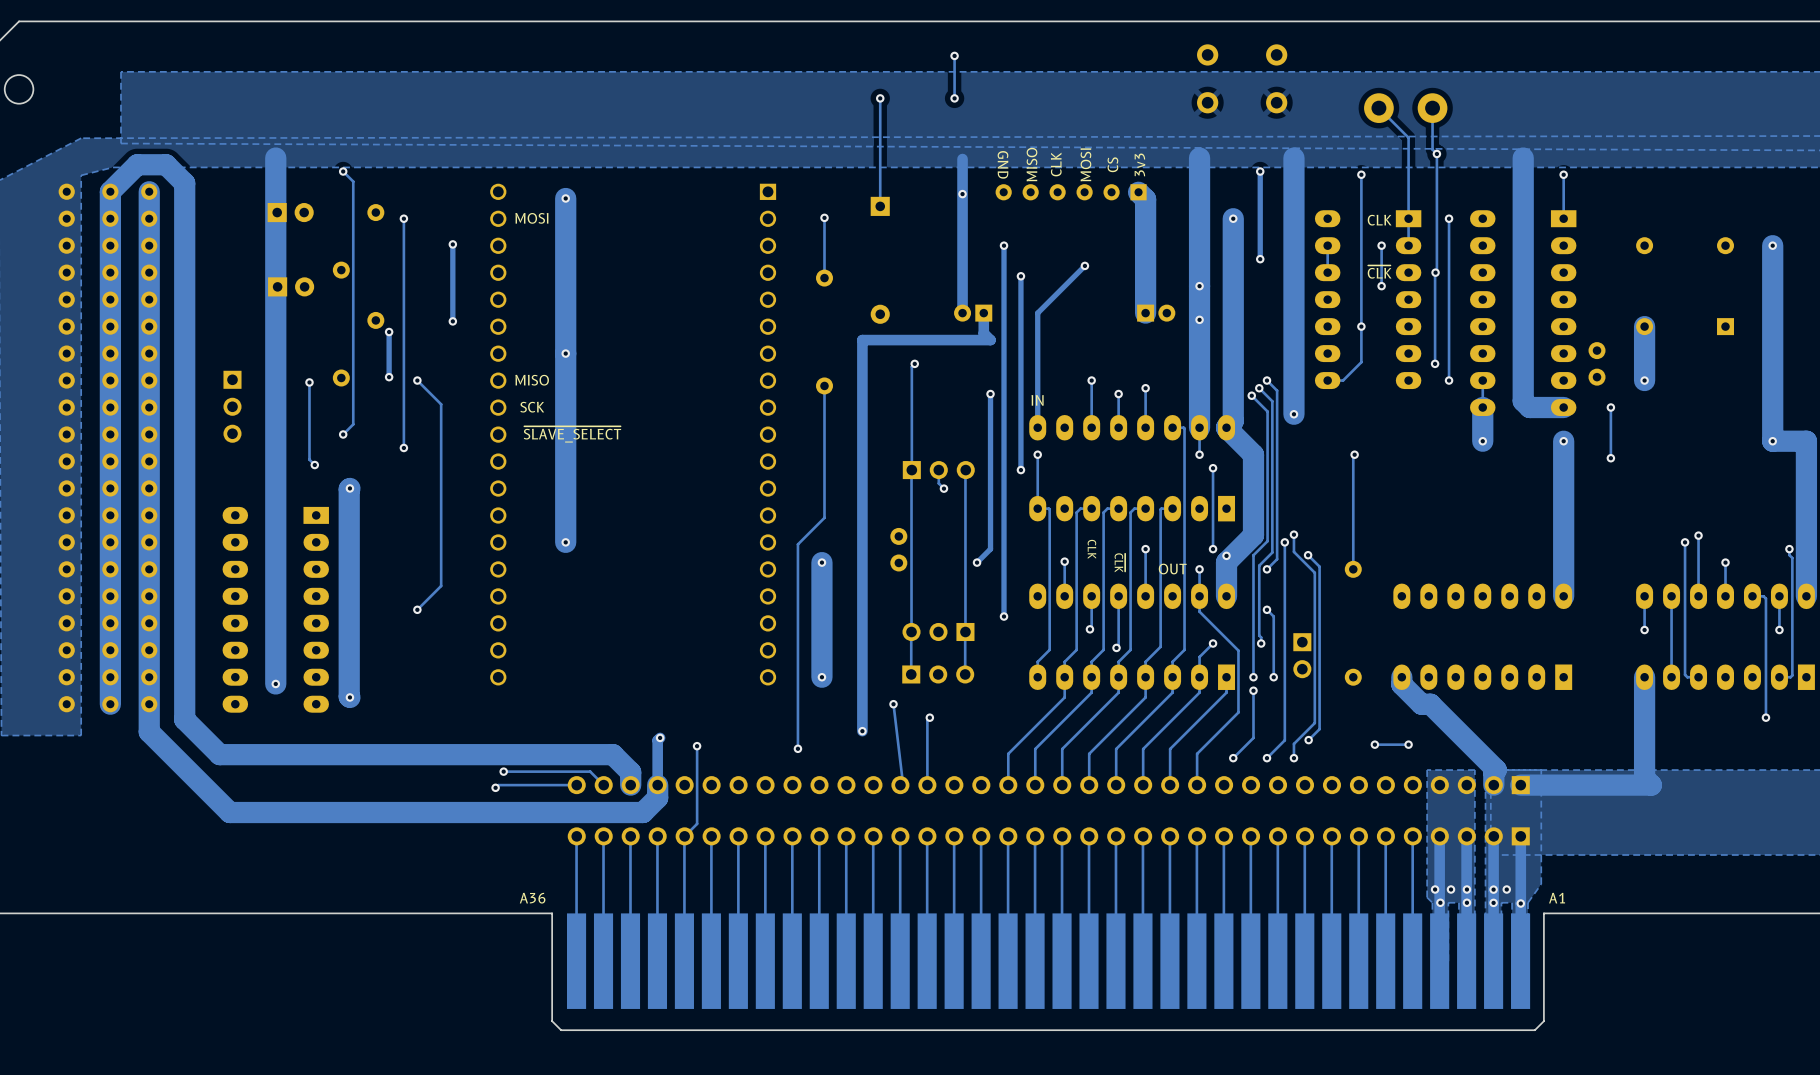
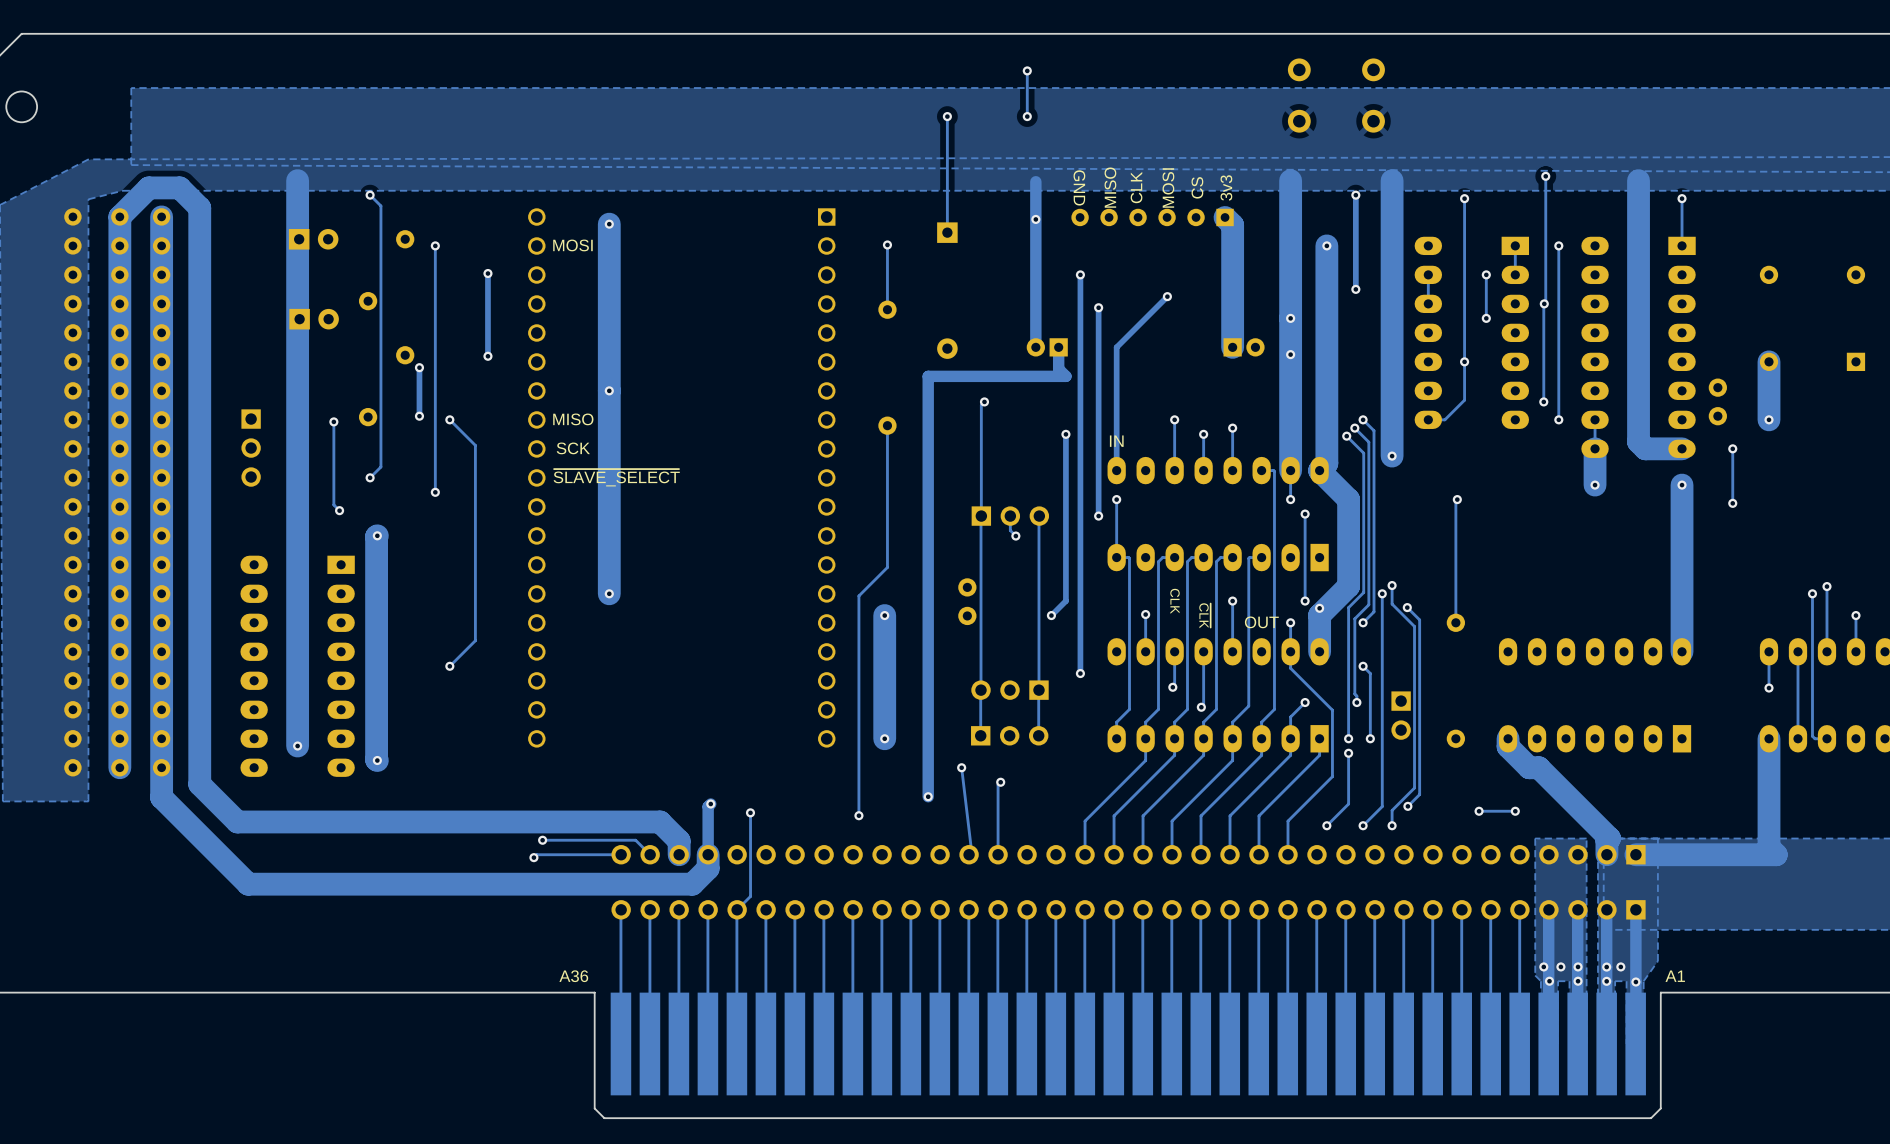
track: (1378, 108) (1408, 137) (1408, 218) -> none
part: (1378, 108) -> none
track: (1432, 108) (1432, 149) (1436, 153) -> none
part: (1432, 108) -> none
text: CLK (1379, 220) -> none
text: ~{CLK} (1379, 272) -> none

